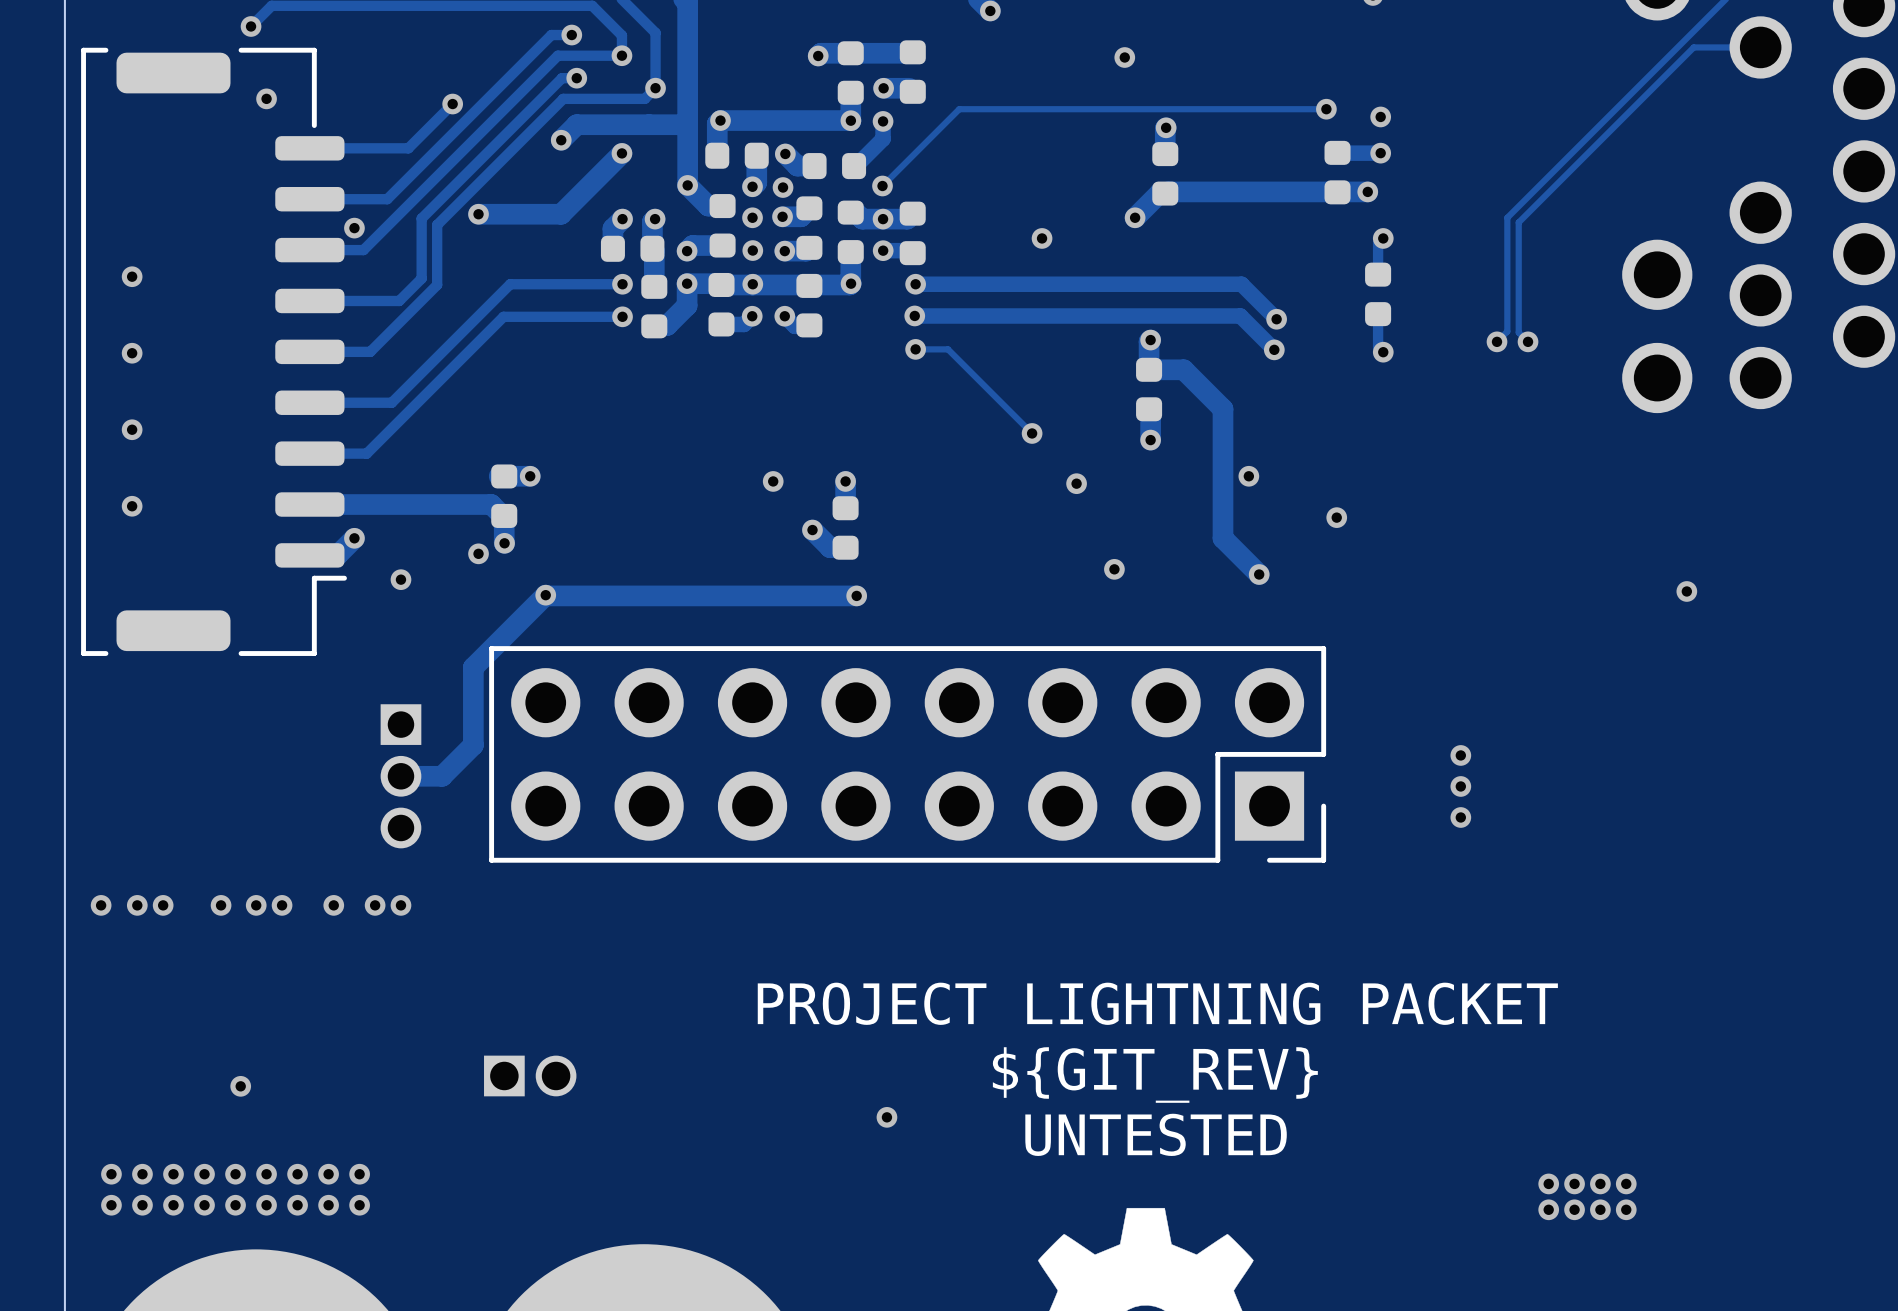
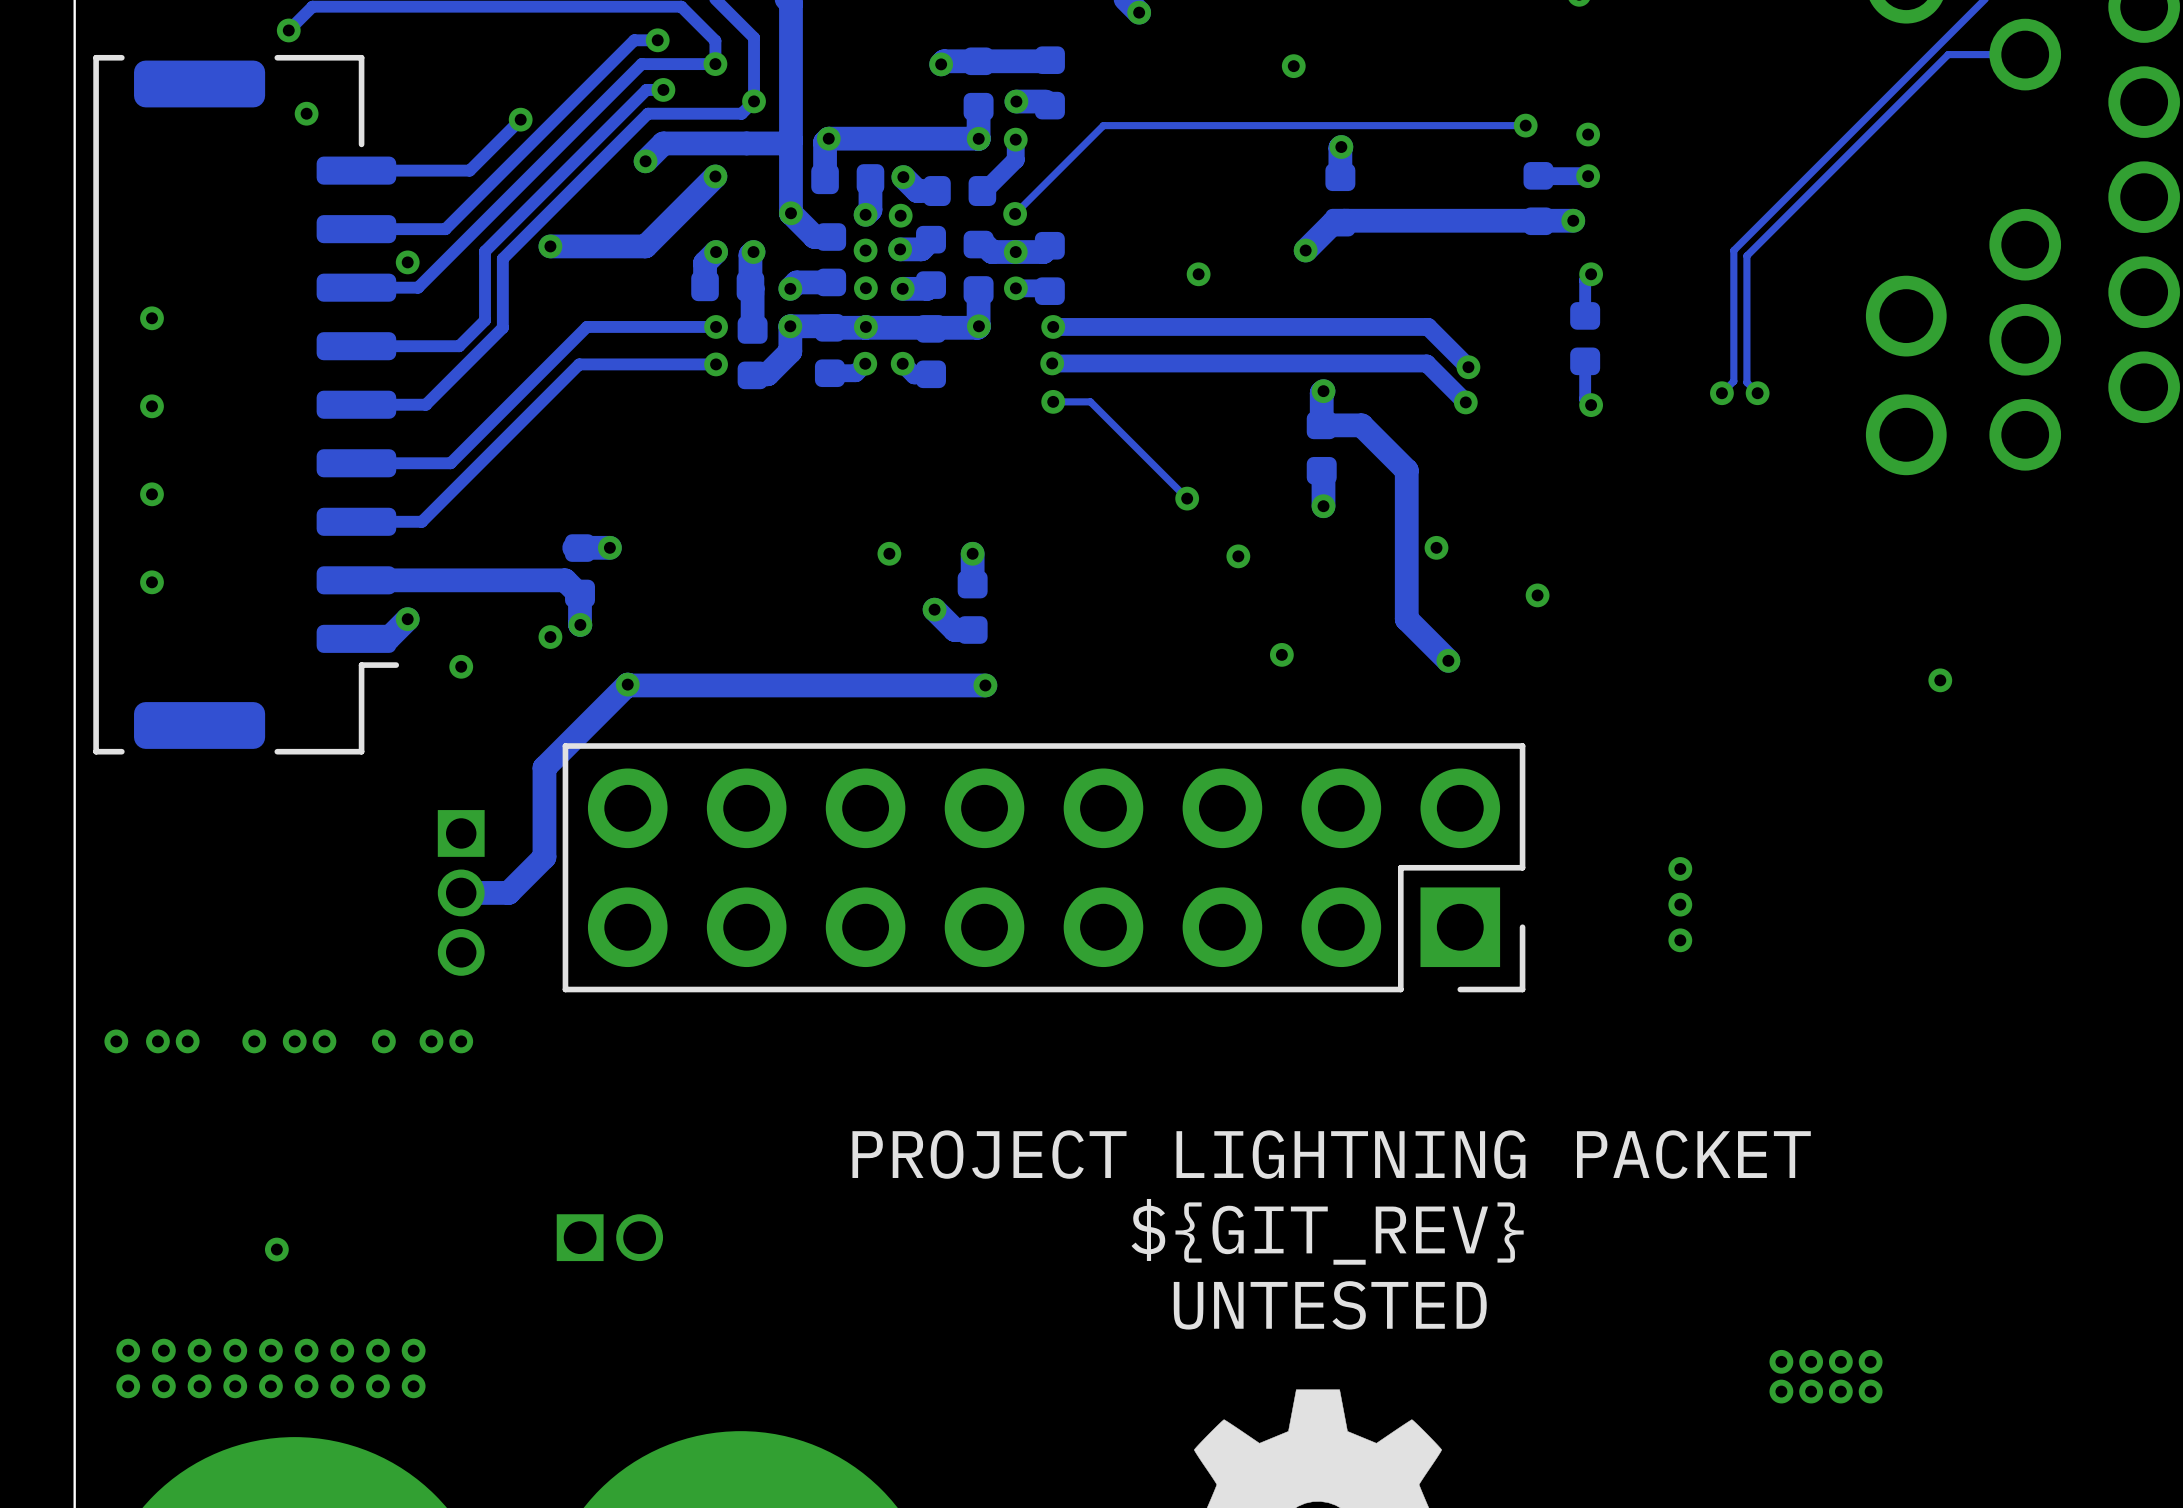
via: (886, 1117) -> none

